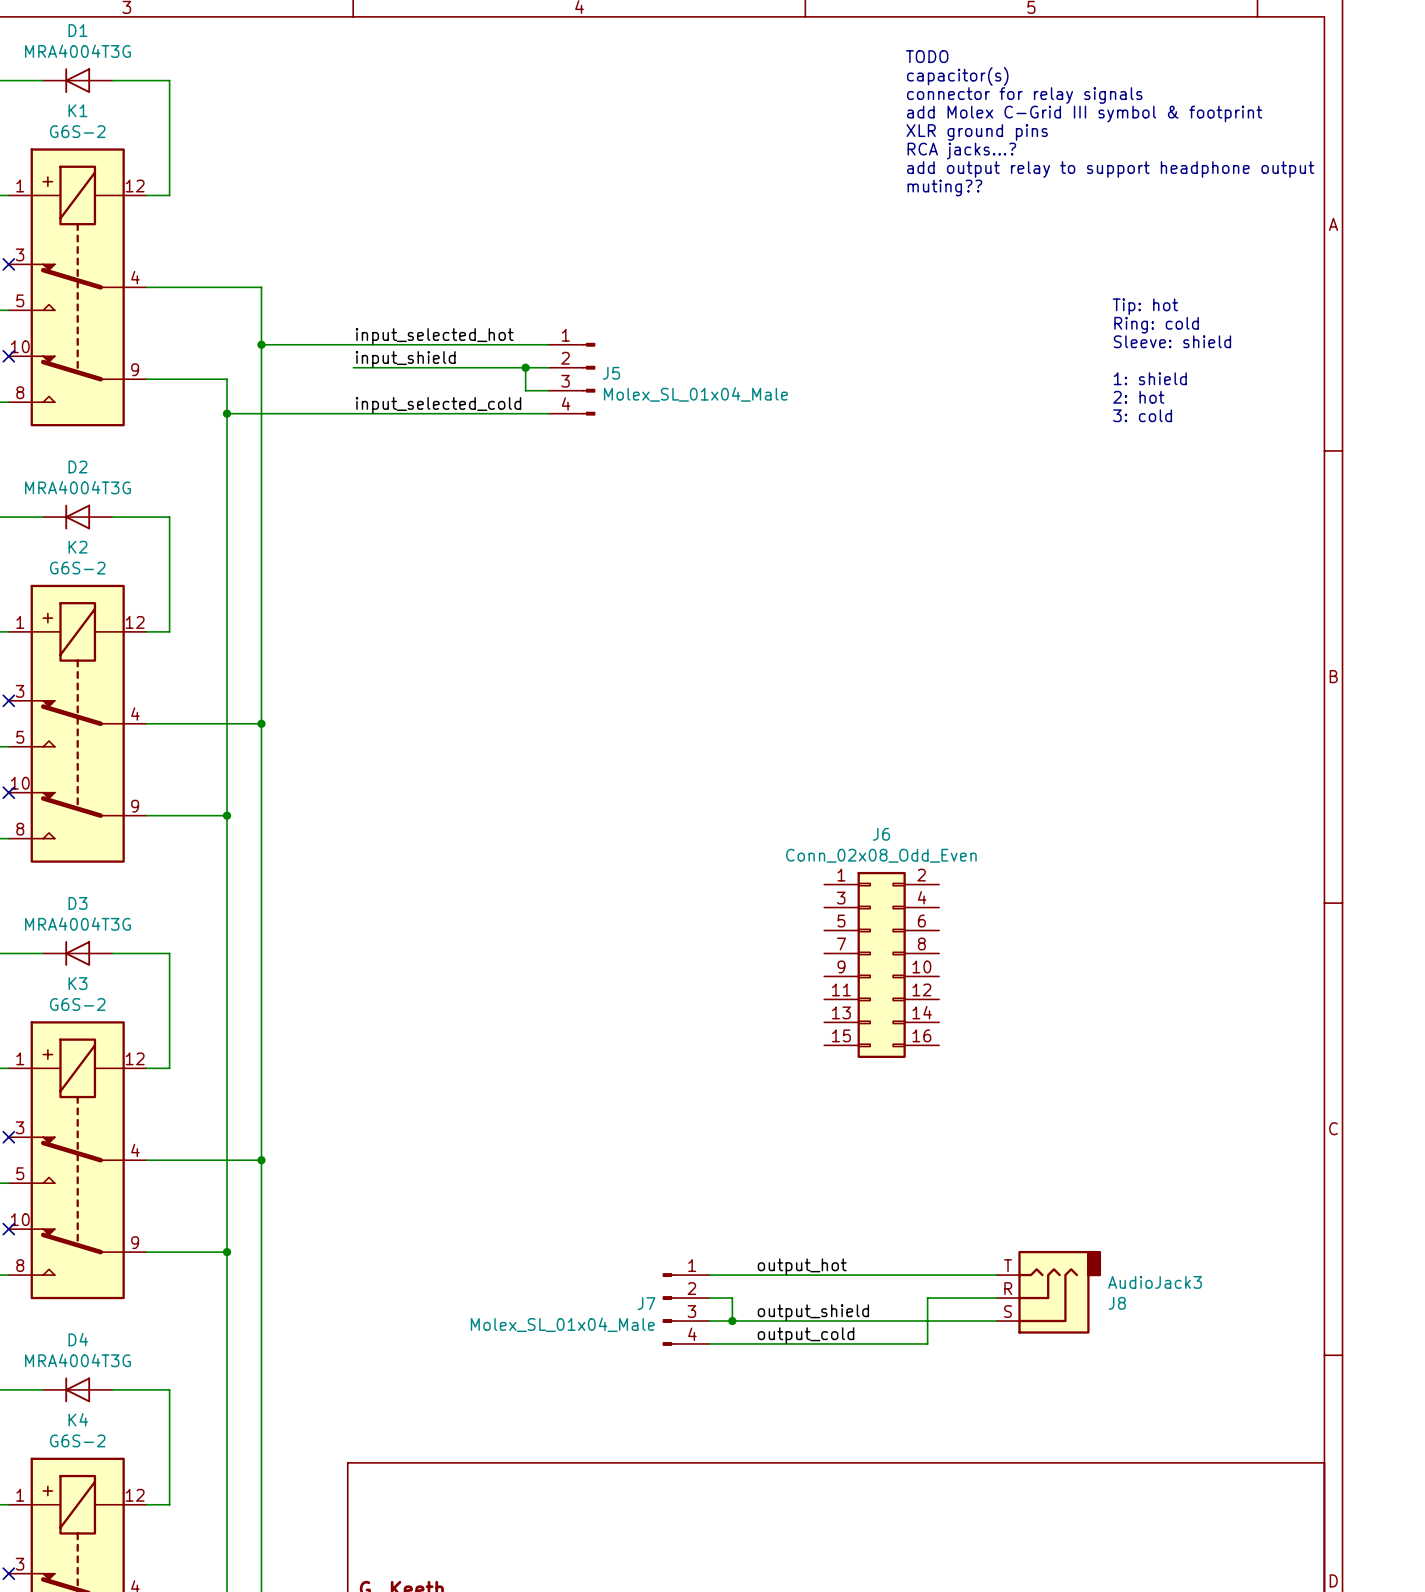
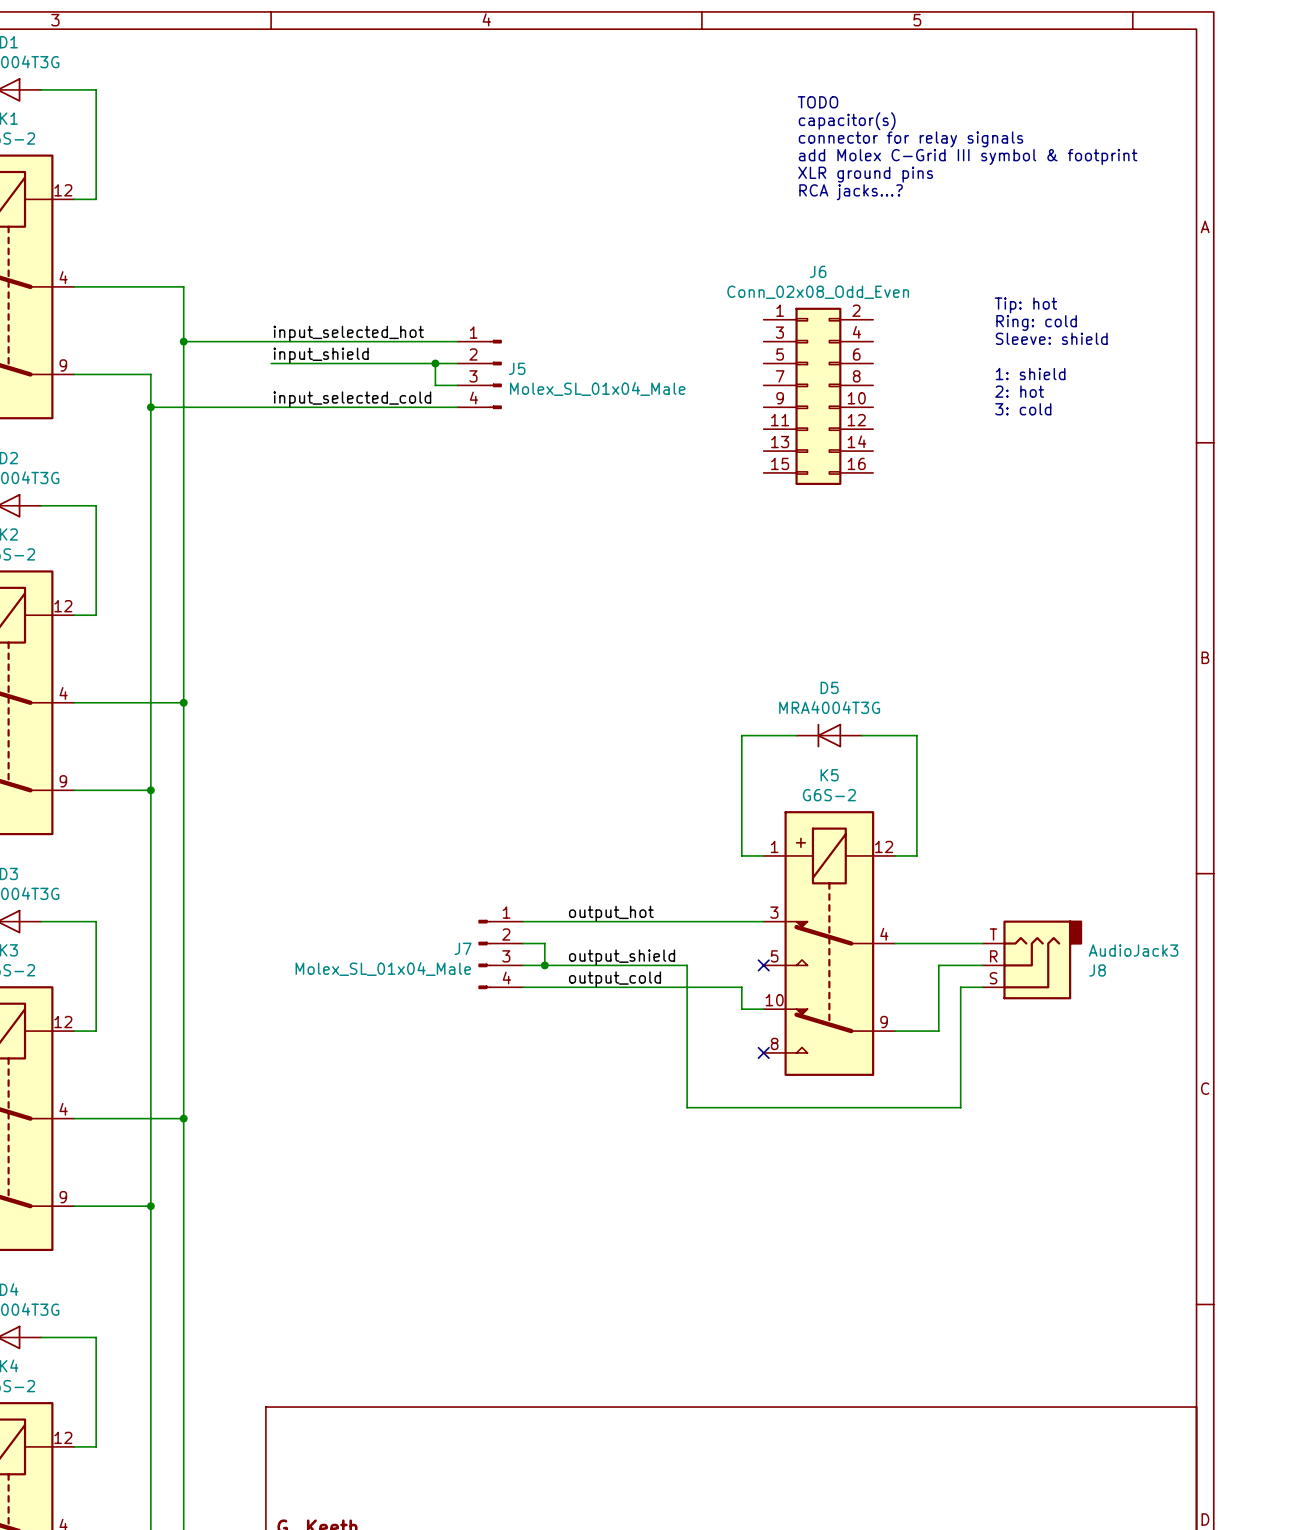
text: TODO (927, 56) -> none
text: capacitor(s) (957, 76) -> none
text: connector for relay signals (1024, 95) -> TODO (817, 102)
text: add Molex C-Grid III symbol & footprint (1084, 114) -> capacitor(s) (847, 121)
text: XLR ground pins (977, 132) -> connector for relay signals (911, 139)
text: RCA jacks...? (961, 150) -> add Molex C-Grid III symbol & footprint (968, 156)
text: add output relay to support headphone output (1110, 169) -> XLR ground pins (865, 174)
text: muting?? (944, 187) -> RCA jacks...? (851, 192)
wire: none -> (796, 735) (741, 735) (741, 855) (763, 855)
D5: none -> MRA4004T3G (829, 735)
wire: none -> (862, 735) (916, 735) (916, 855) (895, 855)
label: none -> output_hot (611, 913)
wire: none -> (522, 921) (763, 921)
J6 position: (881, 964) -> (818, 396)
wire: none -> (522, 943) (544, 943) (544, 965)
K5: none -> G6S-2 (829, 943)
wire: none -> (895, 943) (982, 943)
label: none -> output_shield (622, 957)
wire: none -> (522, 965) (687, 965) (687, 1107) (960, 1107) (960, 987) (982, 987)
junction: none -> (544, 965)
no-connect mark: none -> (763, 965)
wire: none -> (982, 965) (938, 965) (938, 1031) (895, 1031)
label: none -> output_cold (615, 979)
wire: none -> (522, 987) (741, 987) (741, 1009) (763, 1009)
no-connect mark: none -> (763, 1052)
label: output_hot (802, 1266) -> none
wire: (709, 1275) (996, 1275) -> none
J8 position: (1048, 1292) -> (1032, 959)
wire: (709, 1298) (732, 1298) (732, 1321) -> none
wire: (996, 1298) (927, 1298) (927, 1343) (709, 1343) -> none
J7 position: (686, 1309) -> (500, 954)
label: output_shield (813, 1312) -> none
wire: (709, 1321) (996, 1321) -> none
junction: (732, 1321) -> none
label: output_cold (806, 1335) -> none

